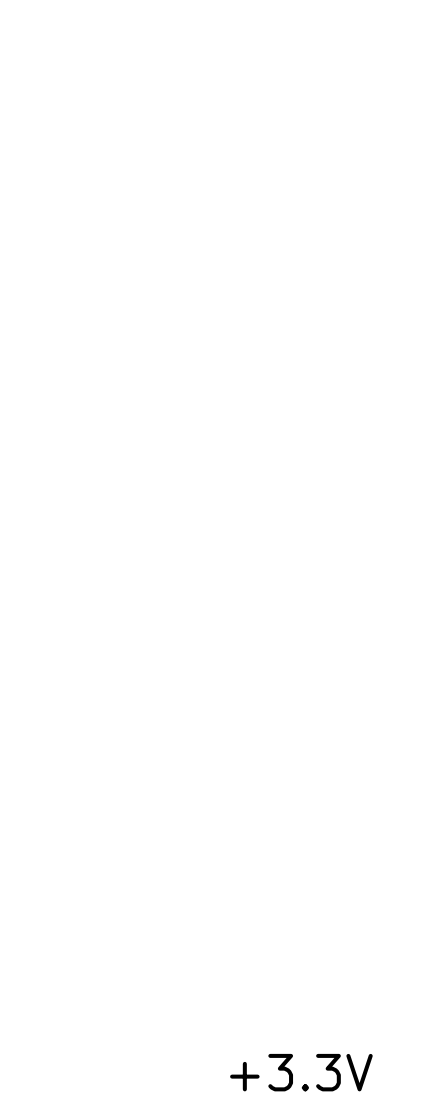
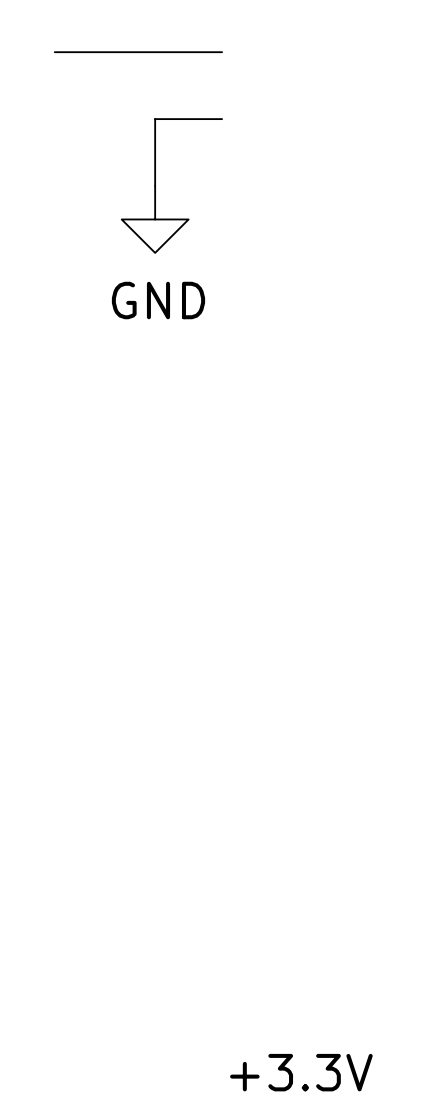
wire: none -> (54, 52) (222, 52)
wire: none -> (222, 119) (155, 119) (155, 186)
power symbol: none -> GND (155, 219)

